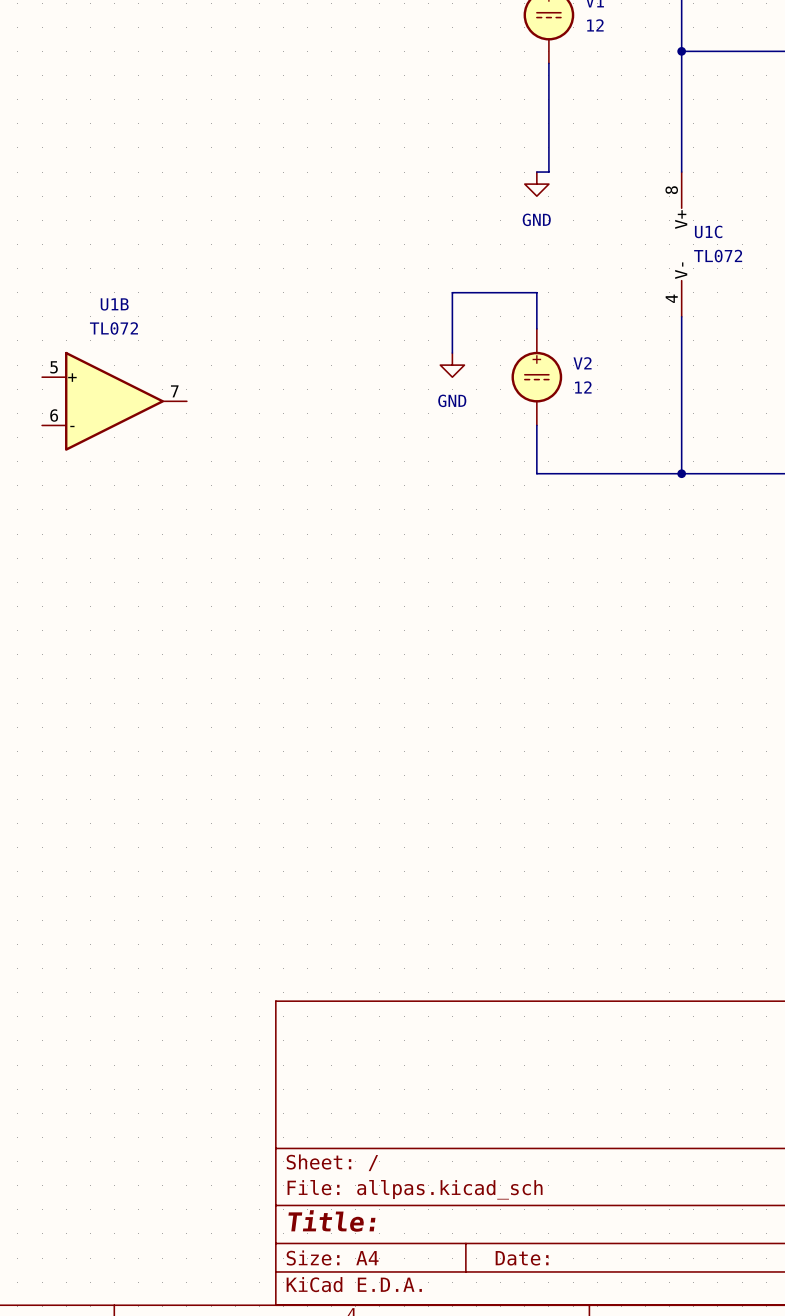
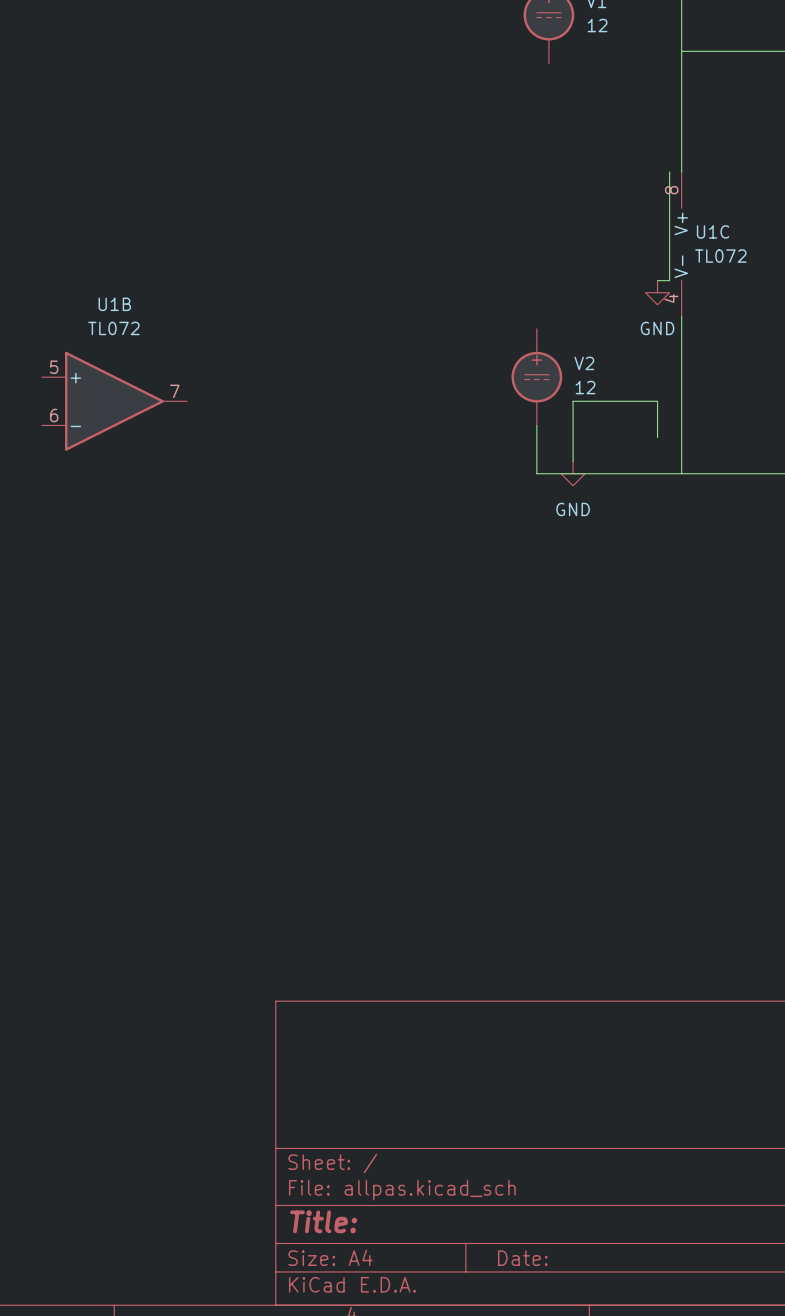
junction: (681, 51) -> none
wire: (548, 63) (548, 172) (536, 172) -> (669, 172) (669, 280) (657, 280)
power symbol: GND (536, 184) -> none
power symbol: none -> GND (657, 292)
wire: (536, 328) (536, 292) (452, 292) (452, 353) -> (657, 437) (657, 401) (573, 401) (573, 461)
power symbol: GND (452, 365) -> none
power symbol: none -> GND (573, 473)
junction: (681, 473) -> none

